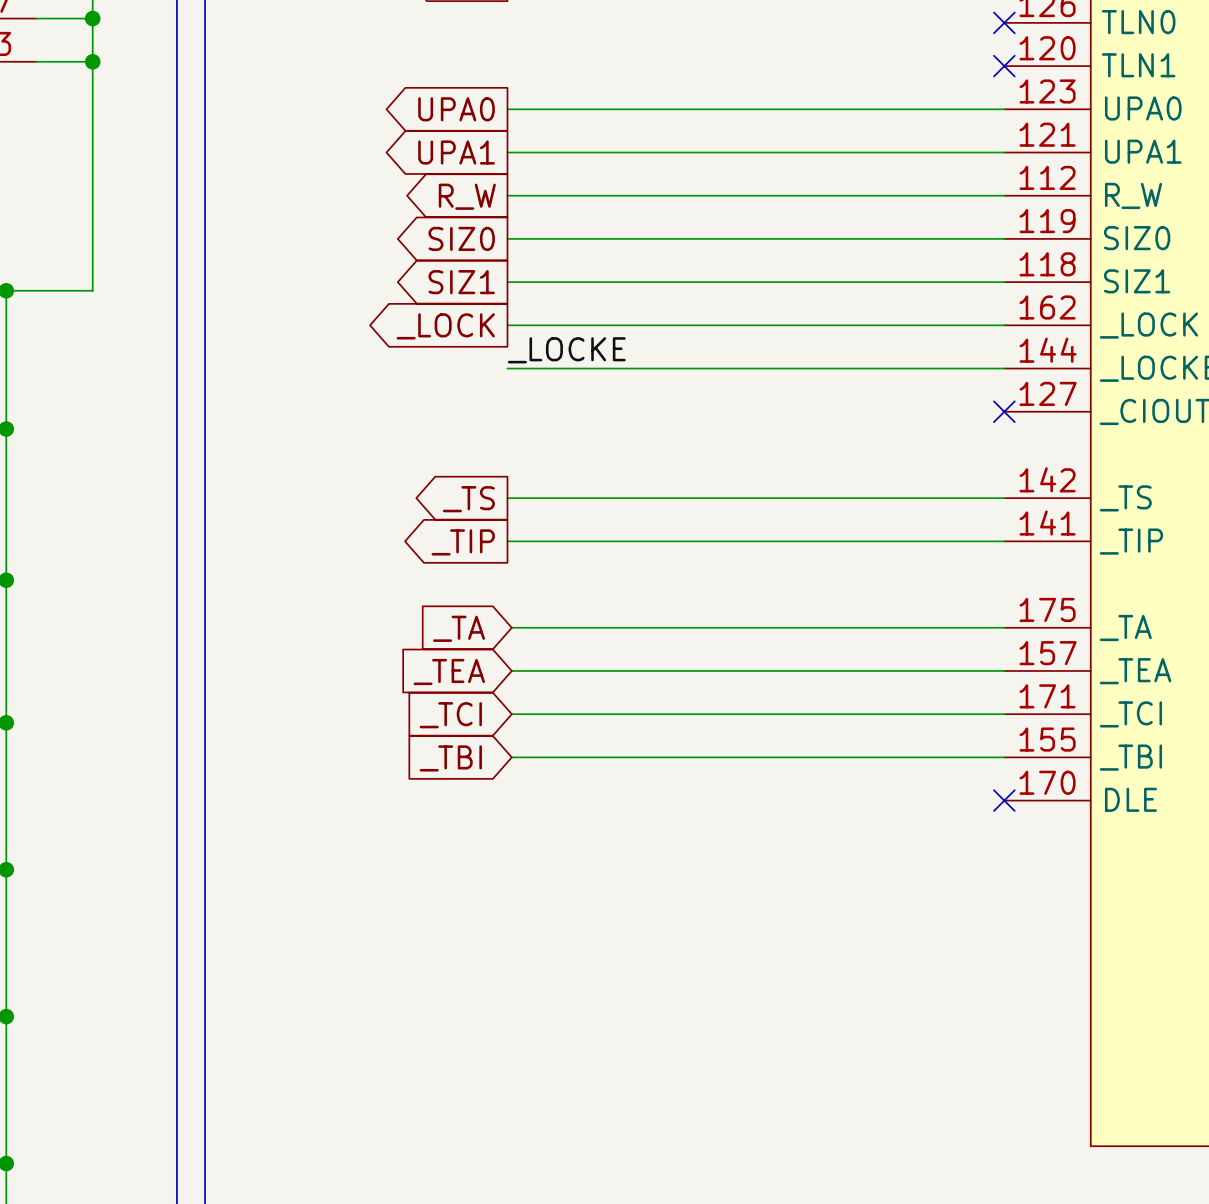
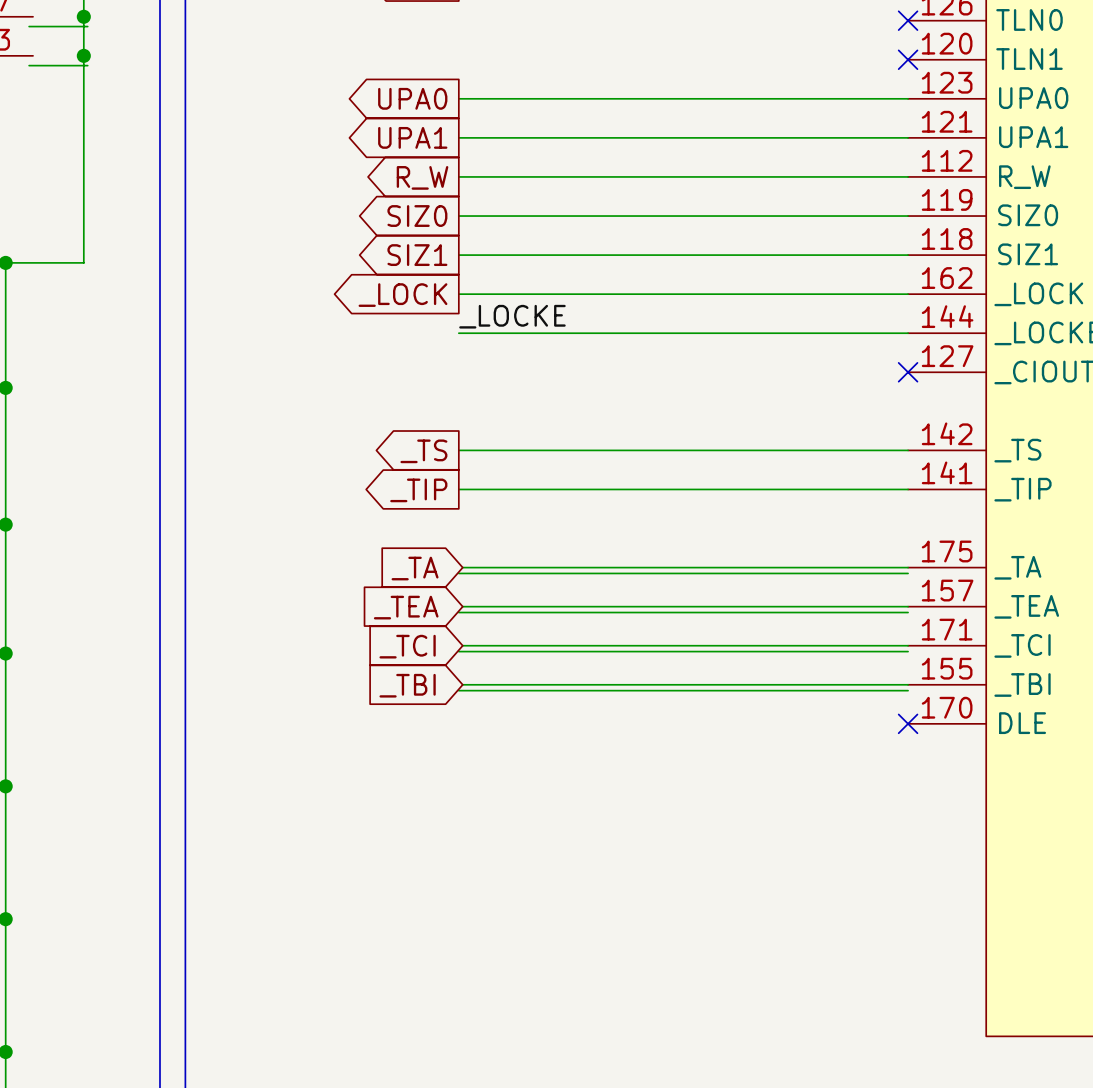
wire: (36, 18) (92, 18) -> none
wire: none -> (29, 26) (87, 26)
wire: (36, 61) (92, 61) -> none
wire: none -> (29, 65) (87, 65)
wire: none -> (458, 573) (908, 573)
wire: none -> (458, 612) (908, 612)
wire: none -> (458, 651) (908, 651)
wire: none -> (458, 690) (908, 690)

